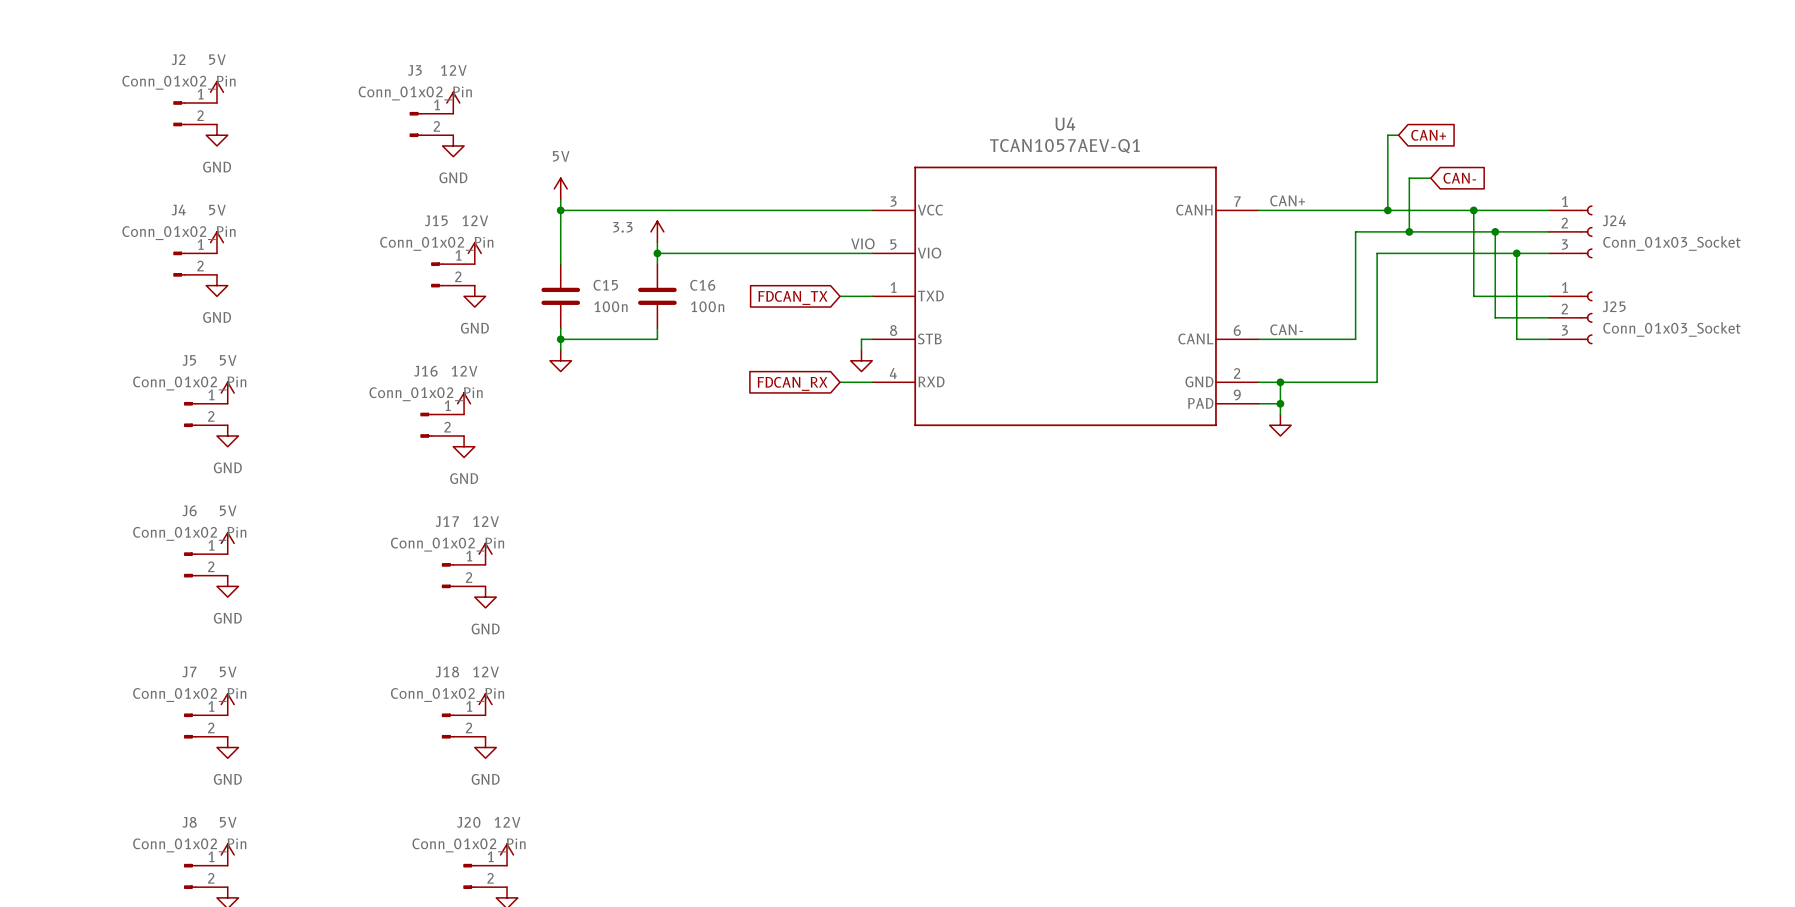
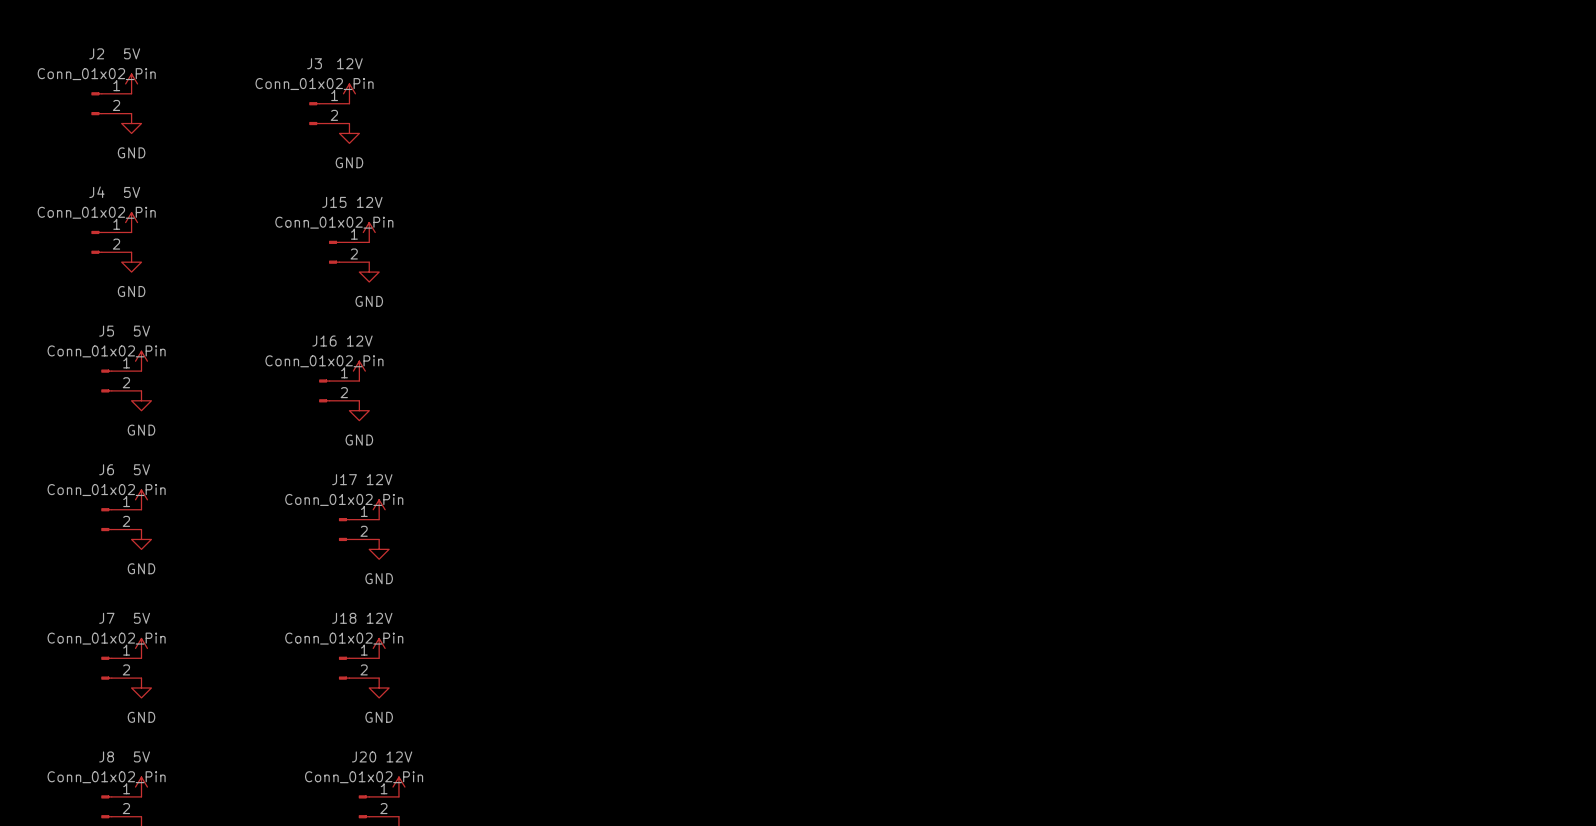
wire: (1398, 135) (1387, 135) (1387, 210) -> none
global label: CAN+ (1428, 135) -> none
wire: (1430, 178) (1409, 178) (1409, 231) -> none
global label: CAN- (1459, 178) -> none
power symbol: 5V (560, 188) -> none
wire: (560, 199) (560, 264) -> none
label: CAN+ (1287, 200) -> none
wire: (560, 210) (872, 210) -> none
junction: (560, 210) -> none
wire: (1258, 210) (1548, 210) -> none
junction: (1387, 210) -> none
wire: (1473, 210) (1473, 296) (1548, 296) -> none
junction: (1473, 210) -> none
power symbol: 3.3 (657, 231) -> none
junction: (1409, 231) -> none
wire: (1495, 231) (1495, 317) (1548, 317) -> none
junction: (1495, 231) -> none
wire: (1548, 231) (1355, 231) (1355, 339) (1258, 339) -> none
J24: Conn_01x03_Socket (1570, 231) -> none
wire: (657, 242) (657, 264) -> none
label: VIO (862, 243) -> none
wire: (657, 253) (872, 253) -> none
junction: (657, 253) -> none
wire: (1516, 253) (1516, 339) (1548, 339) -> none
junction: (1516, 253) -> none
wire: (1548, 253) (1377, 253) (1377, 382) (1258, 382) -> none
C15: 100n (560, 296) -> none
C16: 100n (657, 296) -> none
wire: (840, 296) (872, 296) -> none
U4: TCAN1057AEV-Q1 (1065, 296) -> none
global label: FDCAN_TX (792, 297) -> none
J25: Conn_01x03_Socket (1570, 317) -> none
wire: (560, 328) (560, 350) -> none
wire: (657, 328) (657, 339) (560, 339) -> none
label: CAN- (1286, 329) -> none
junction: (560, 339) -> none
wire: (872, 339) (861, 339) (861, 350) -> none
power symbol: (560, 360) -> none
power symbol: (861, 360) -> none
wire: (840, 382) (872, 382) -> none
wire: (1280, 382) (1280, 414) -> none
junction: (1280, 382) -> none
global label: FDCAN_RX (792, 383) -> none
wire: (1258, 403) (1280, 403) -> none
junction: (1280, 403) -> none
power symbol: (1280, 425) -> none

